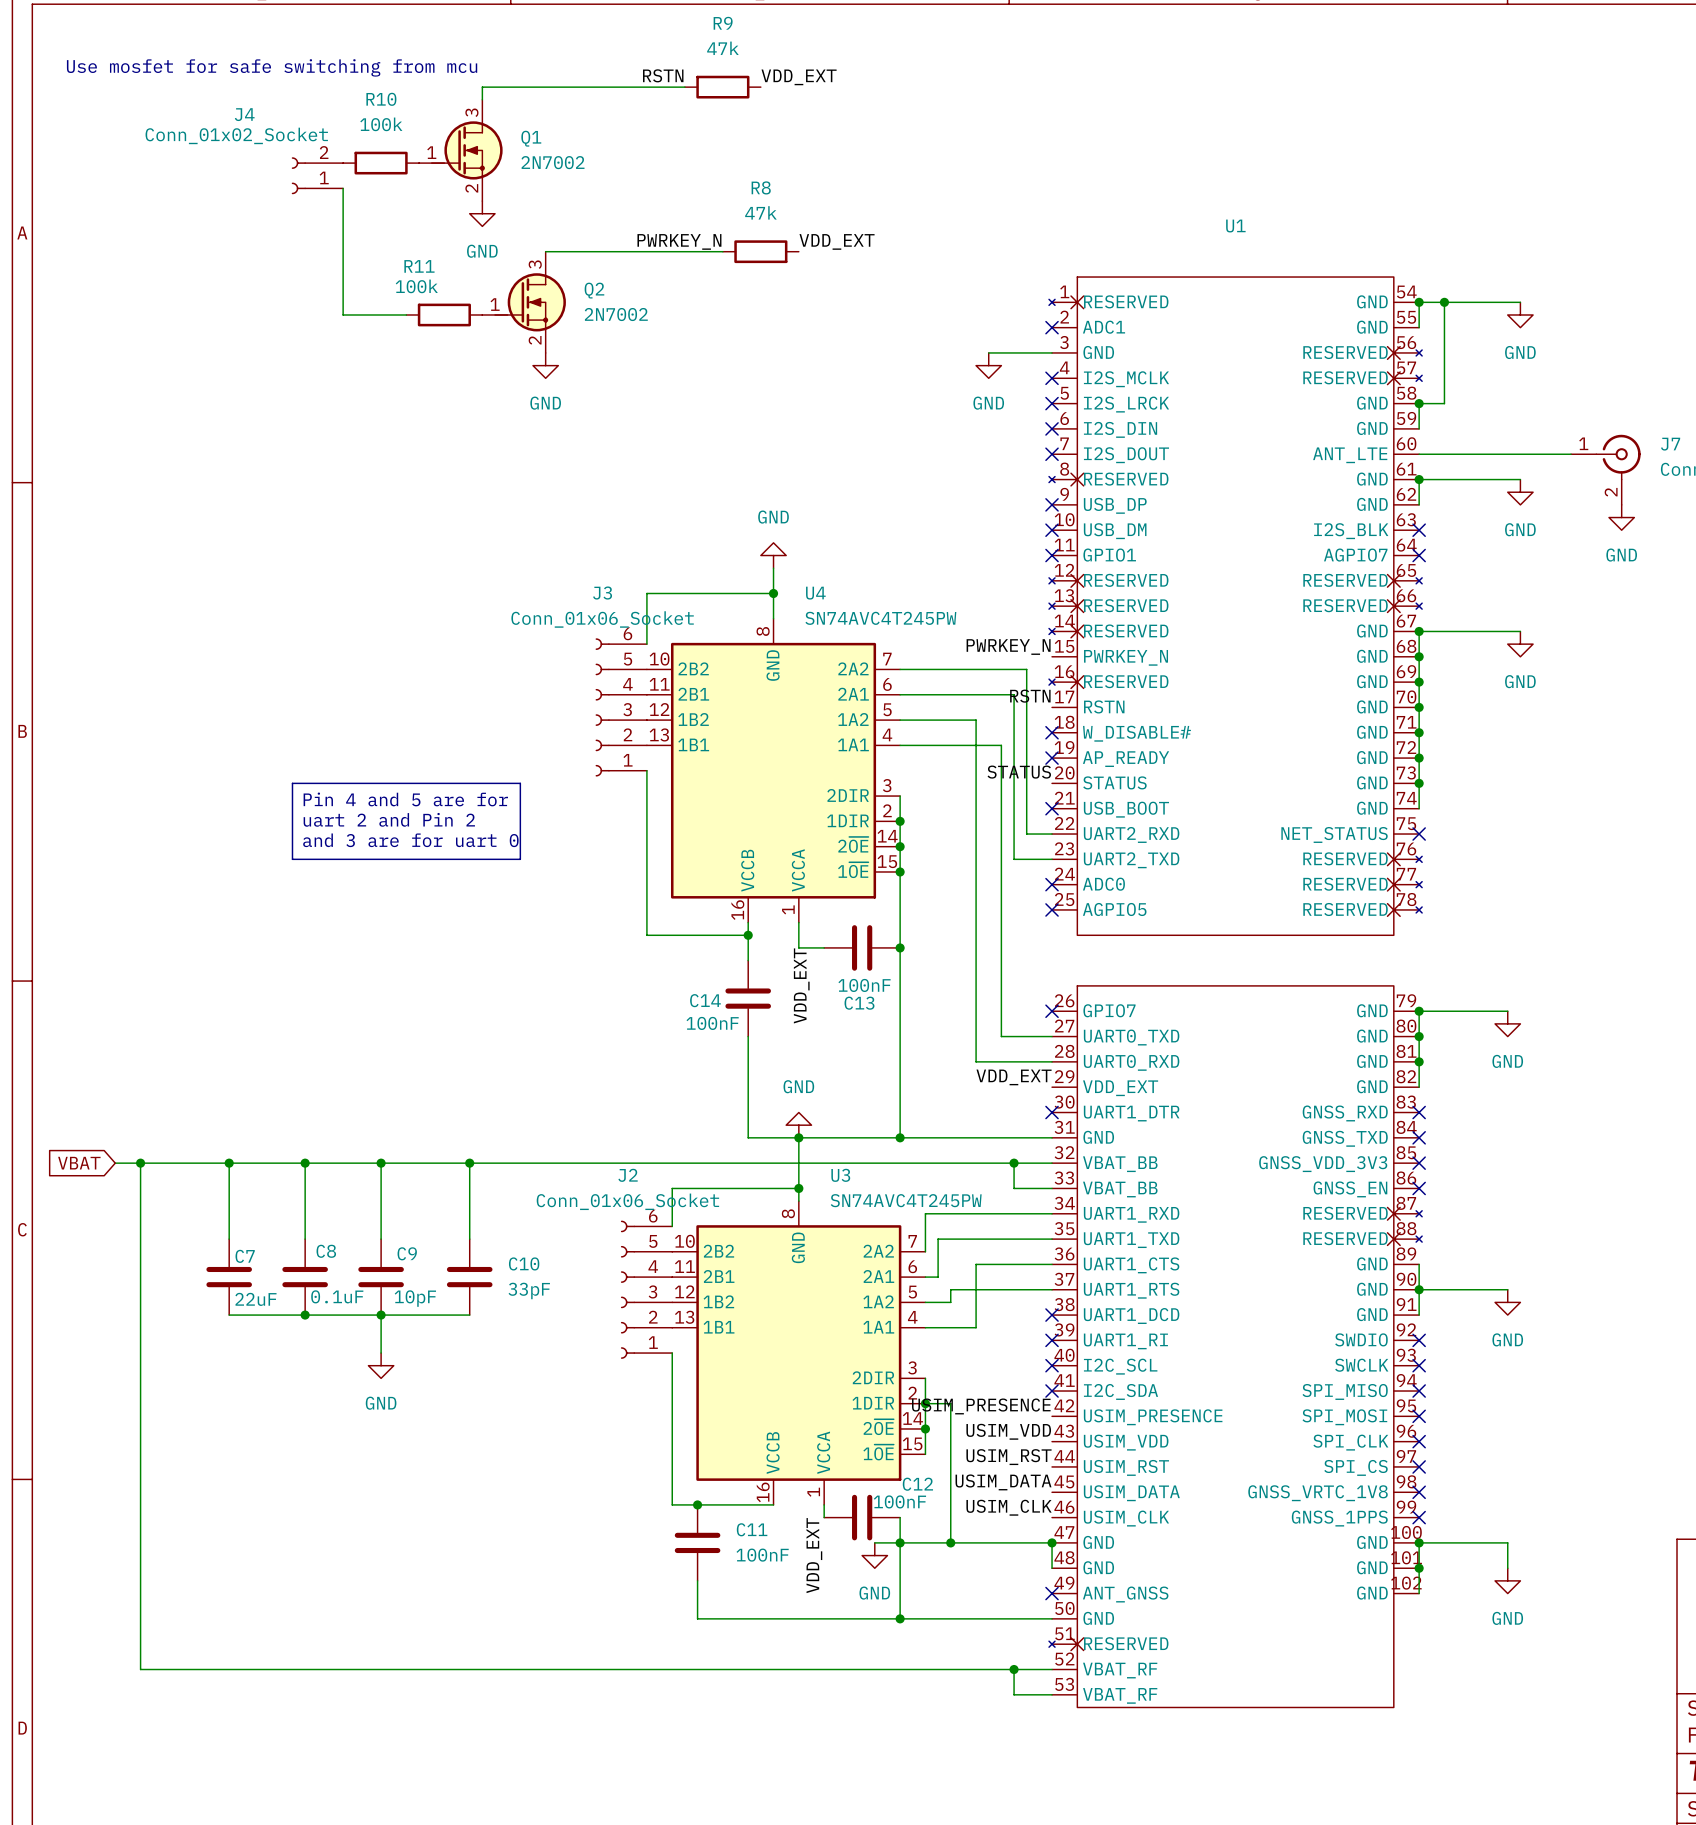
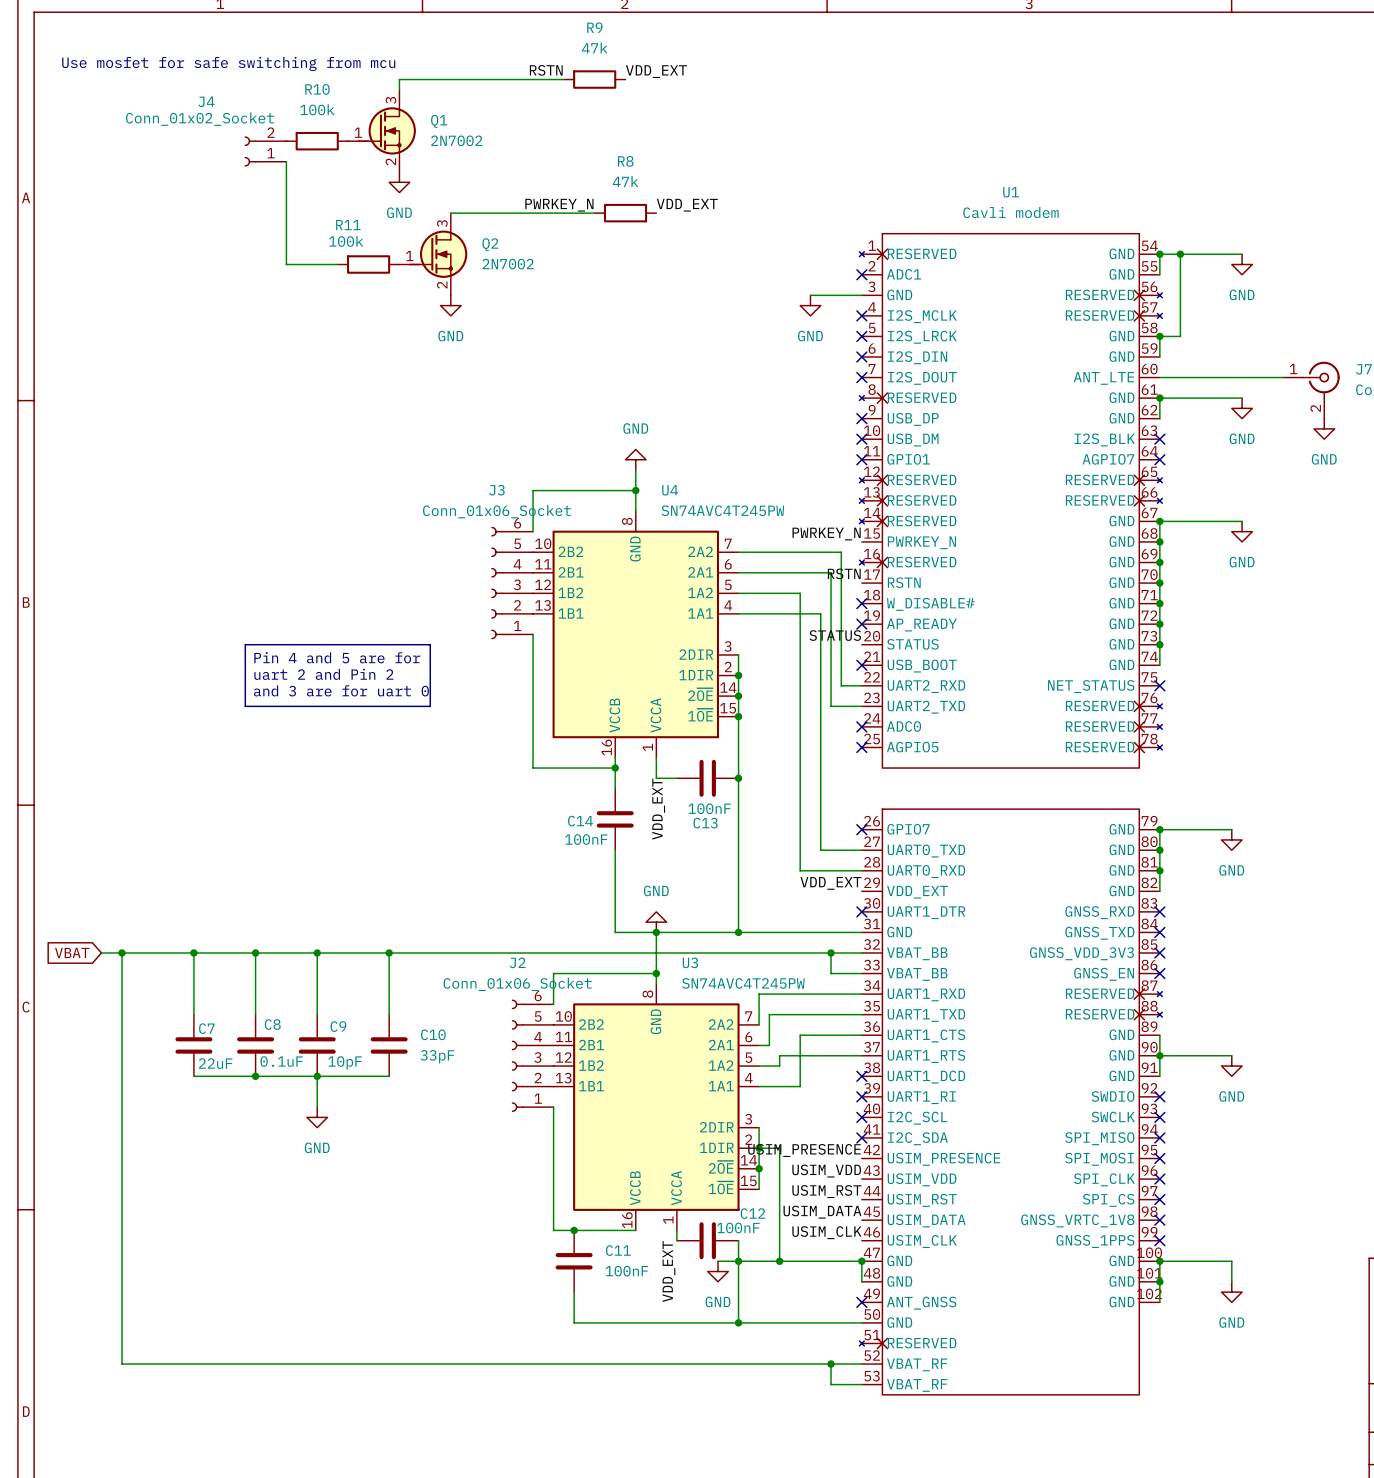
U1 value: none -> Cavli modem (1010, 212)

